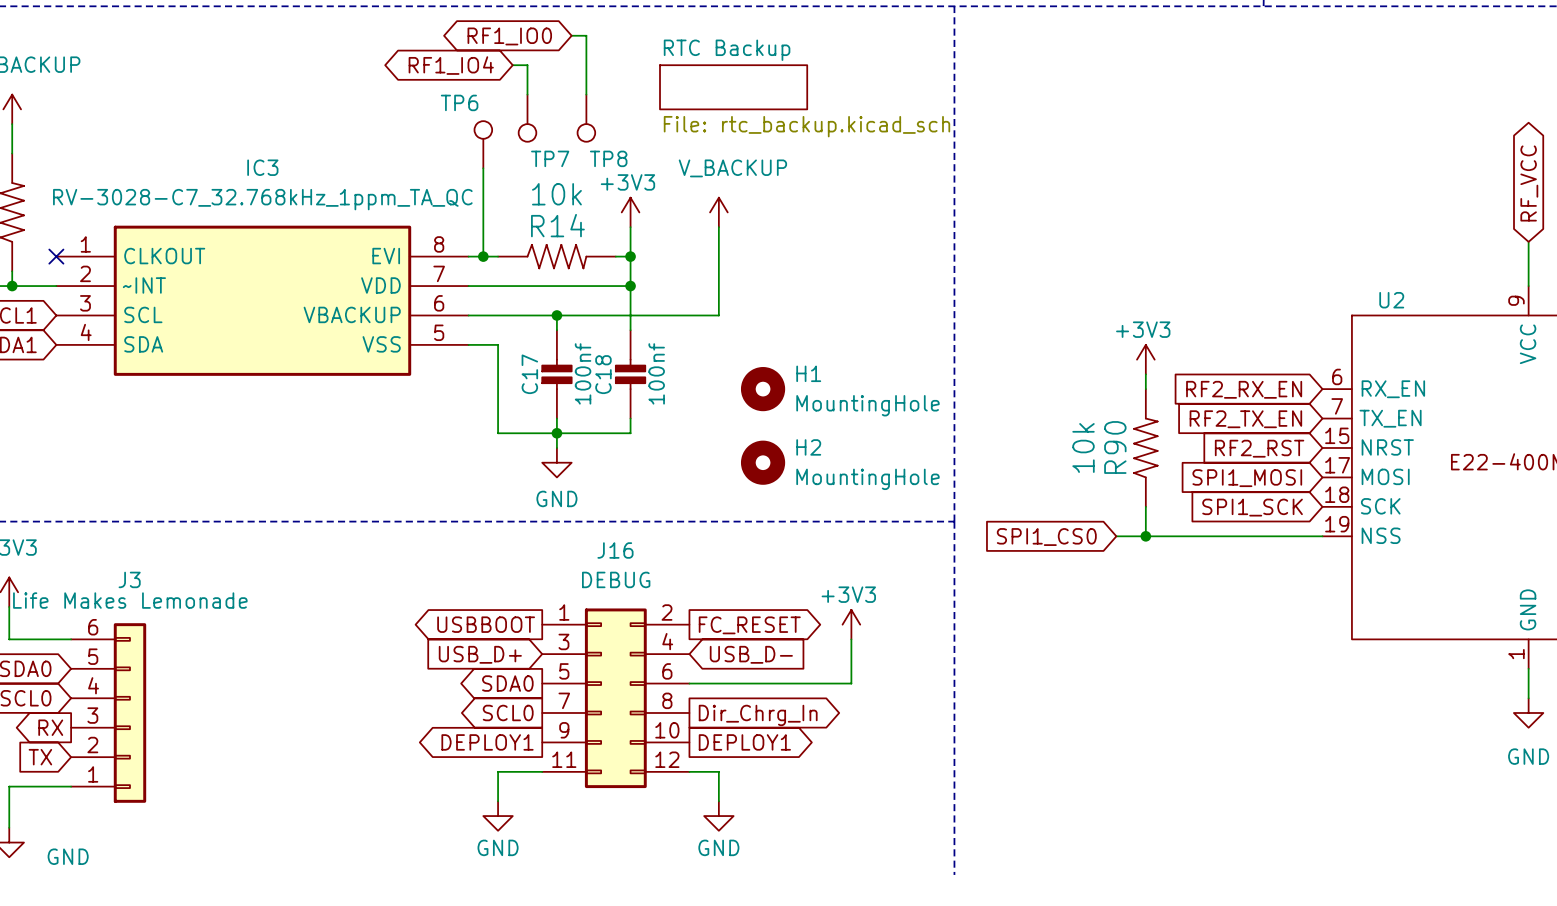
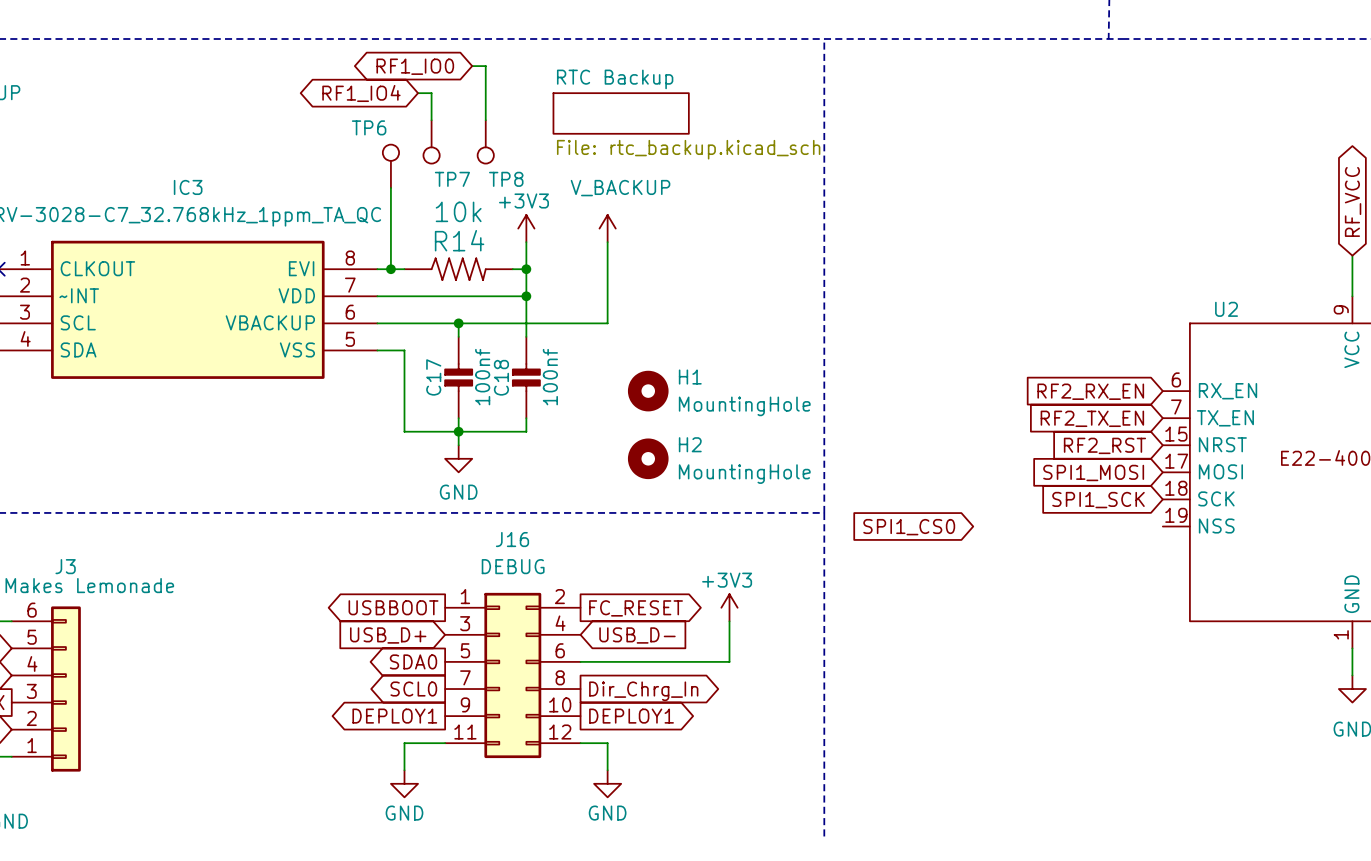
power symbol: +3V3 (1145, 359) -> none
wire: (1145, 374) (1145, 389) -> none
R90: 10k (1145, 447) -> none
wire: (1145, 506) (1145, 536) -> none
wire: (1116, 536) (1322, 536) -> none
junction: (1145, 536) -> none

